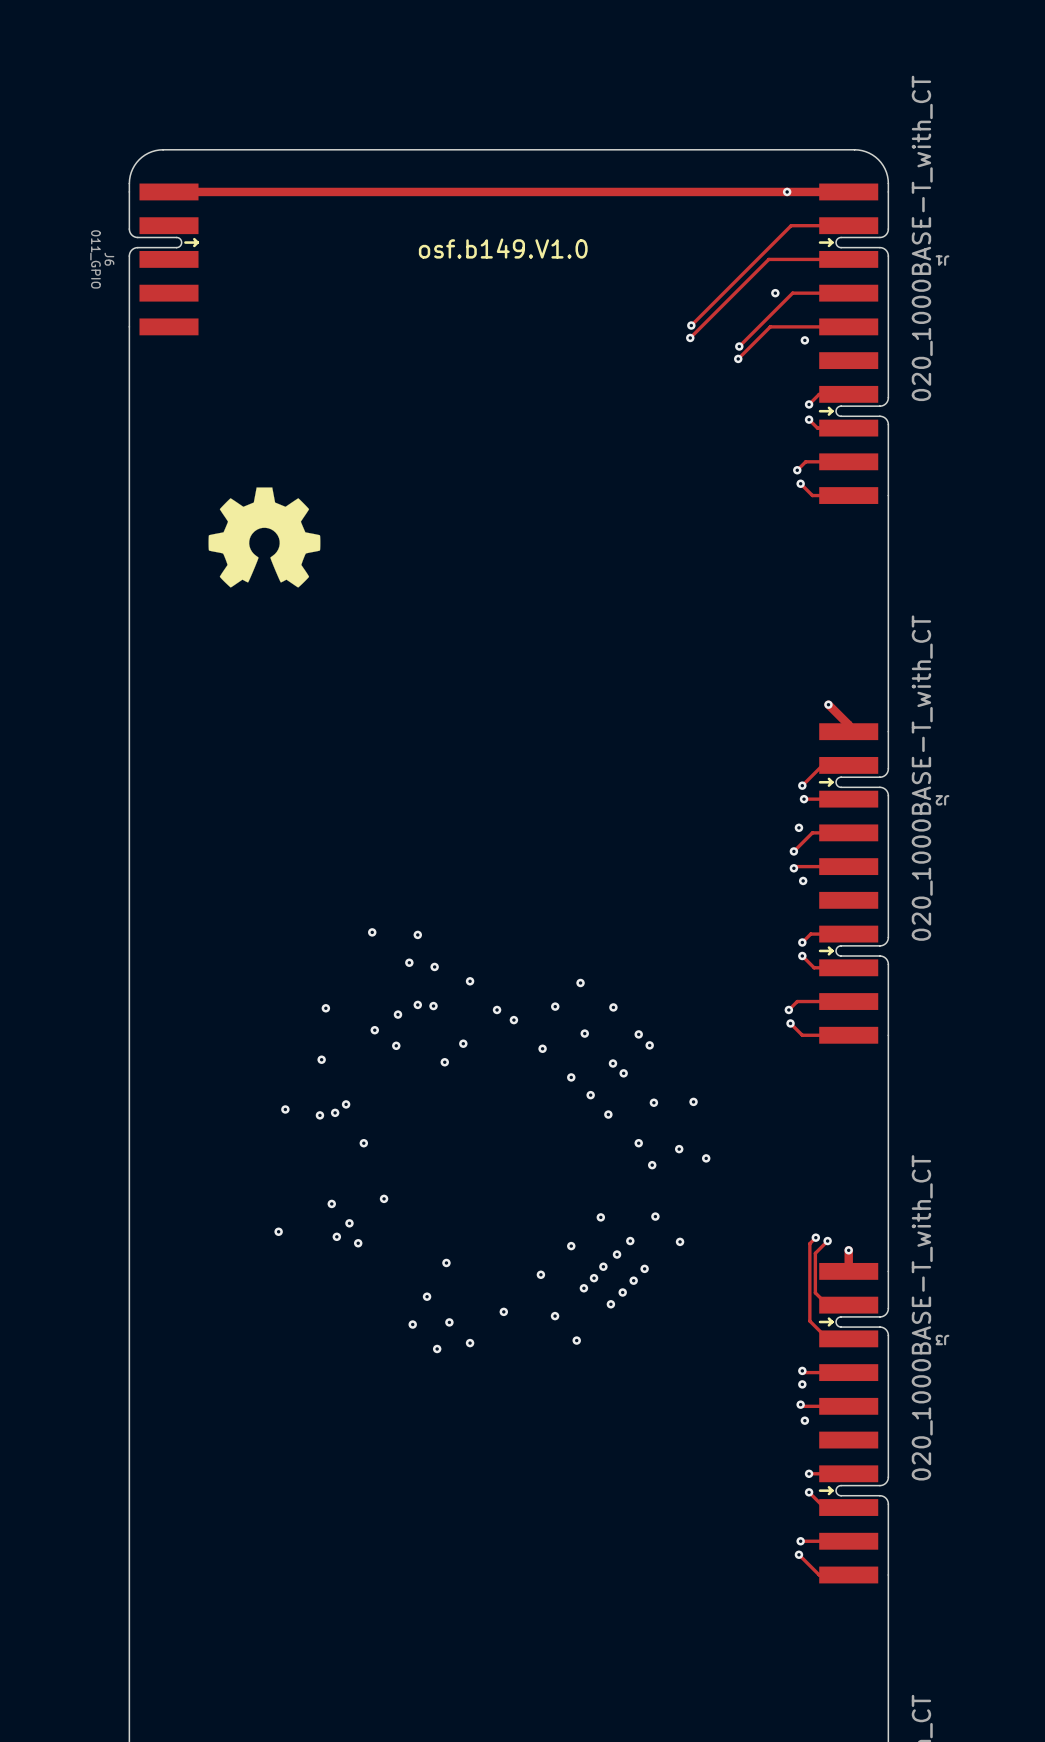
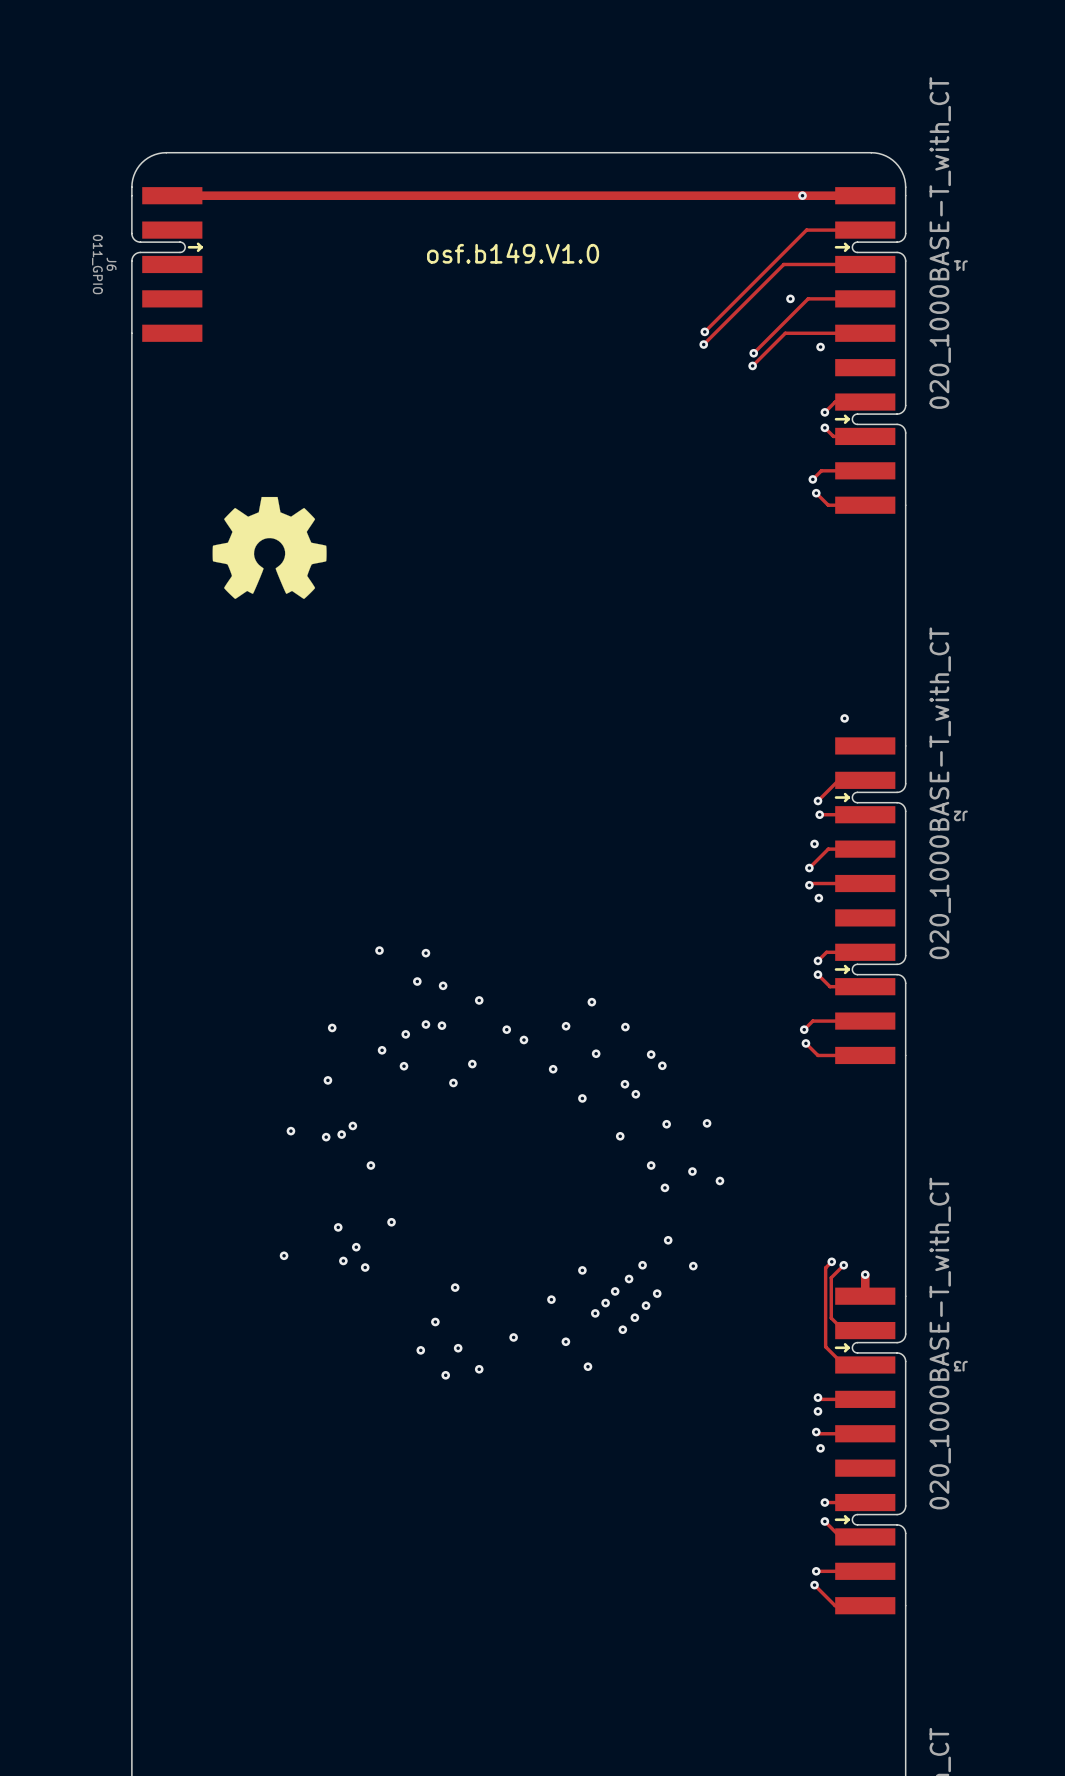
track: (828, 704) (848, 724) (848, 731) -> none
via: (590, 1095) -> none
via: (600, 1217) -> none

